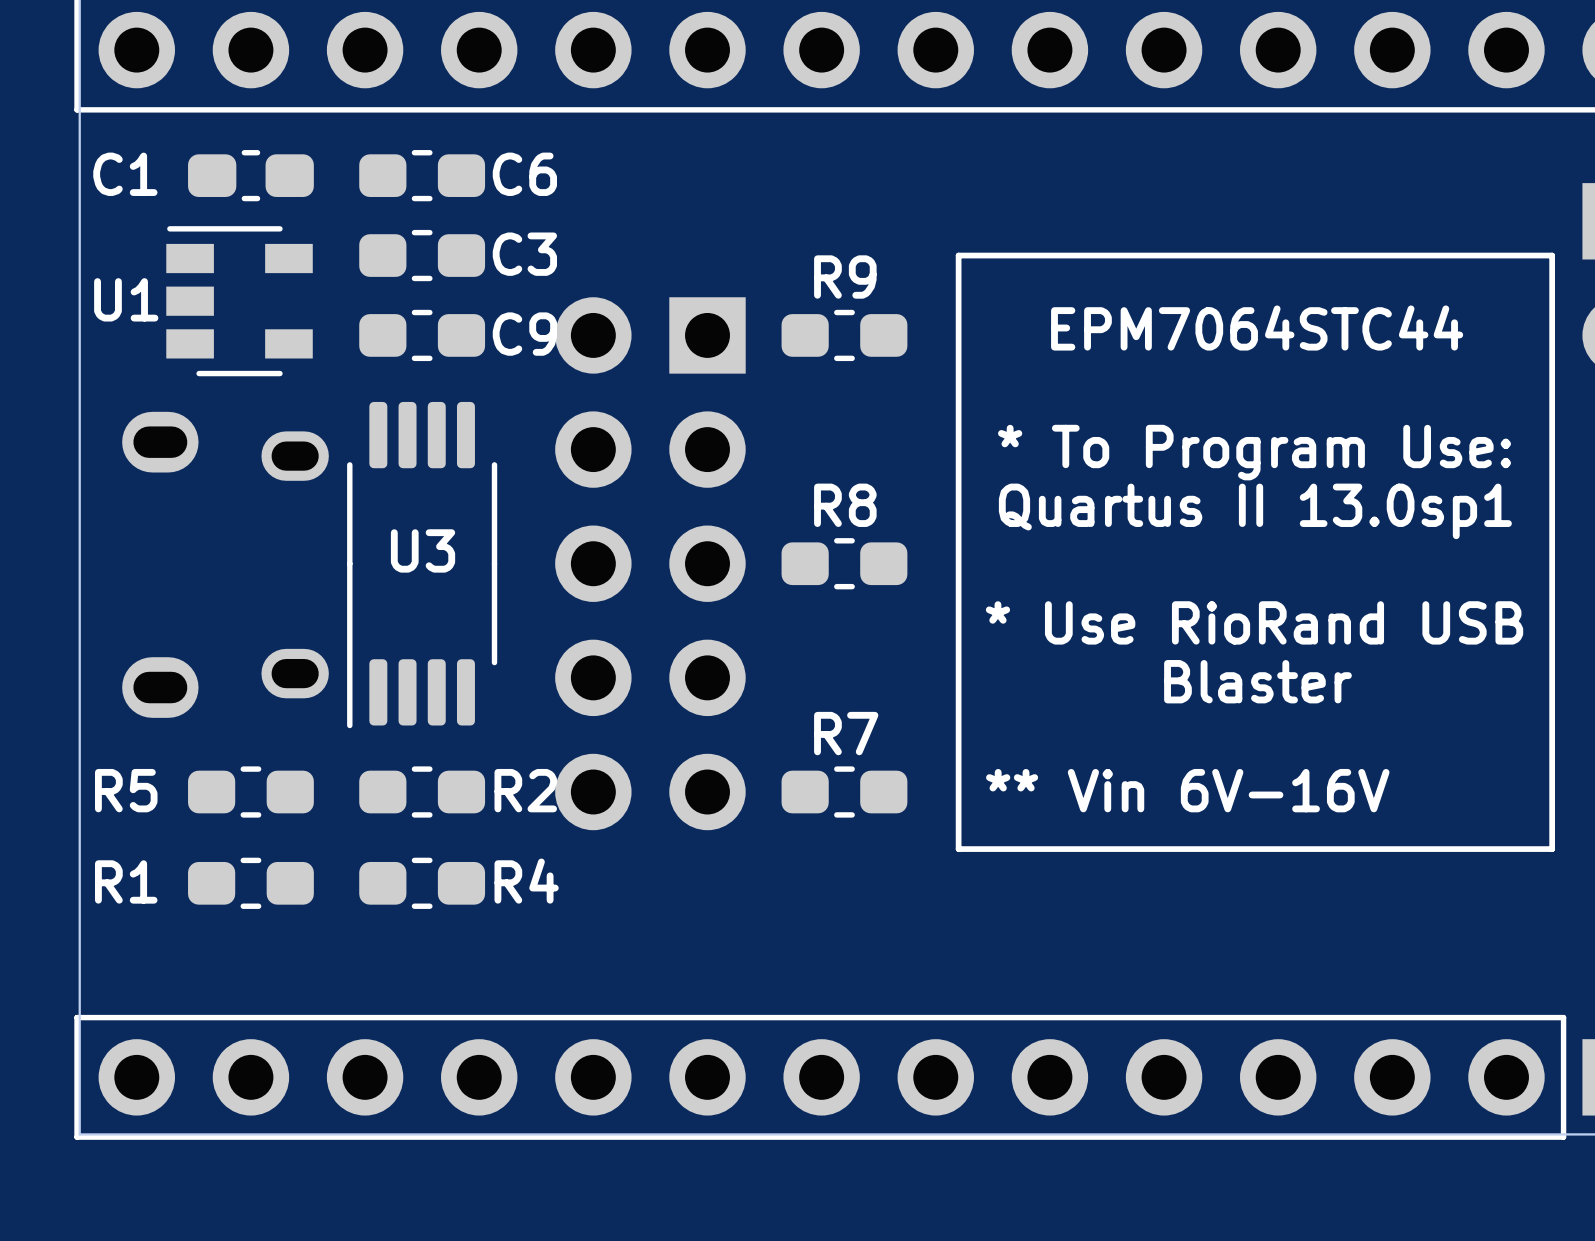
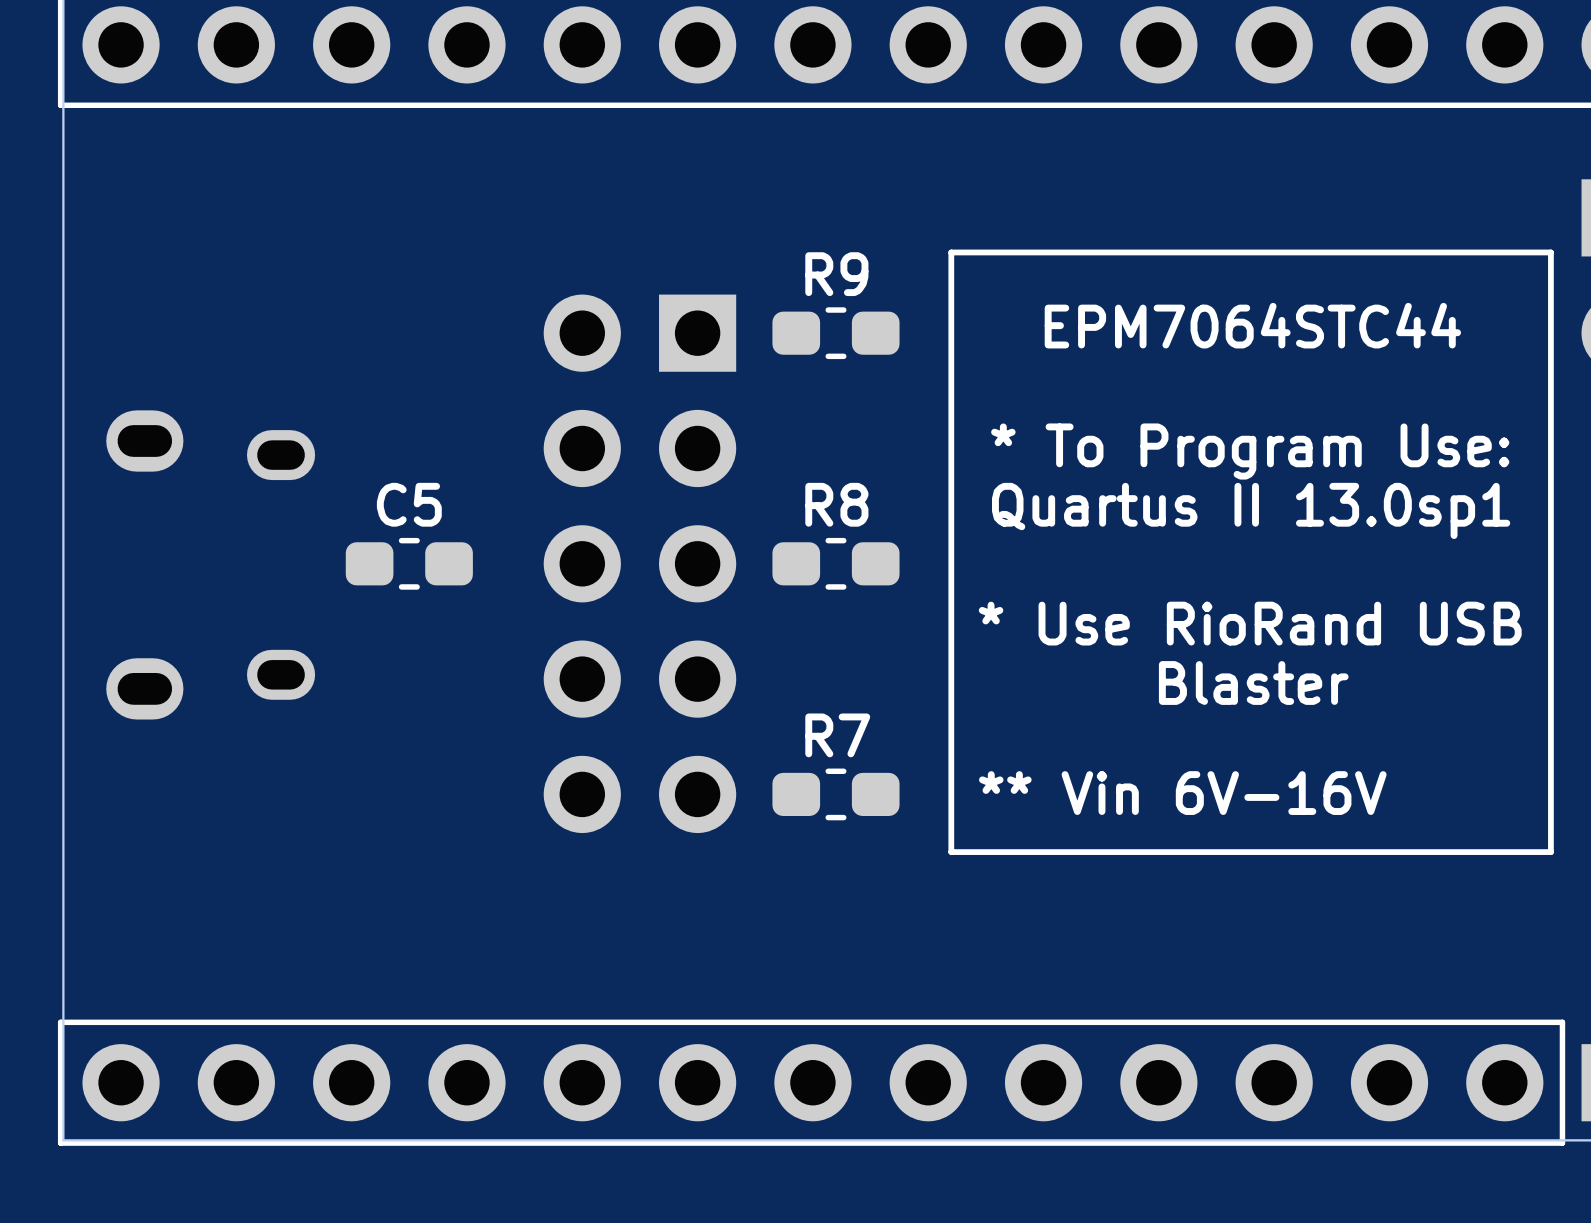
C1: (250, 175) -> none
C6: (422, 175) -> none
C3: (422, 255) -> none
U1: (239, 301) -> none
C9: (422, 335) -> none
C5: none -> (409, 563)
U3: (422, 565) -> none
R5: (250, 792) -> none
R2: (422, 792) -> none
R1: (250, 883) -> none
R4: (422, 883) -> none

